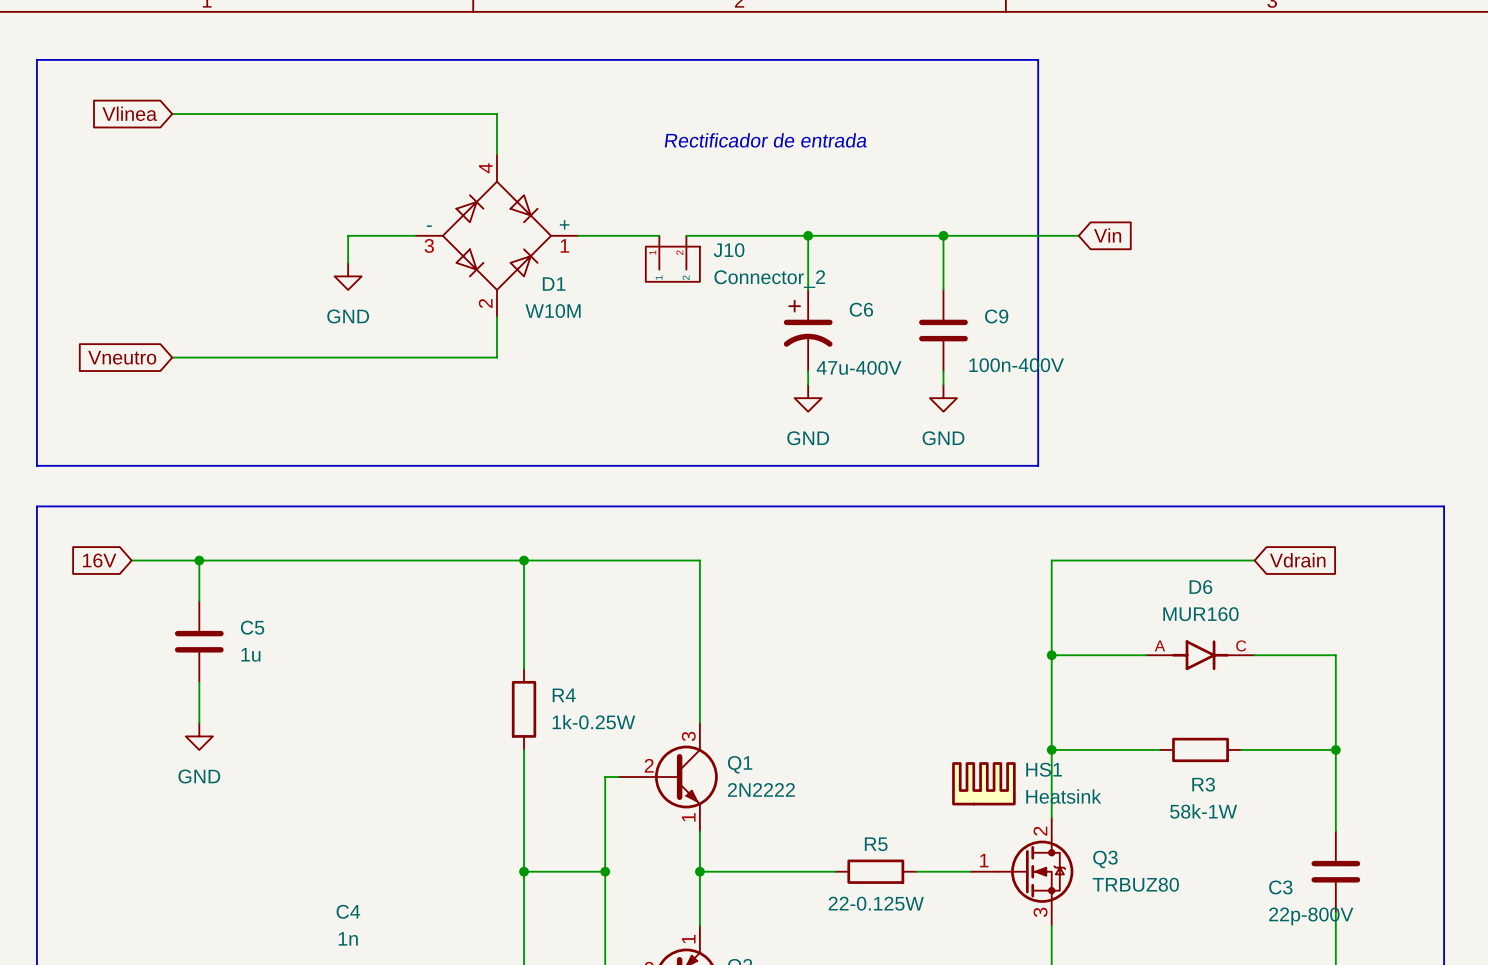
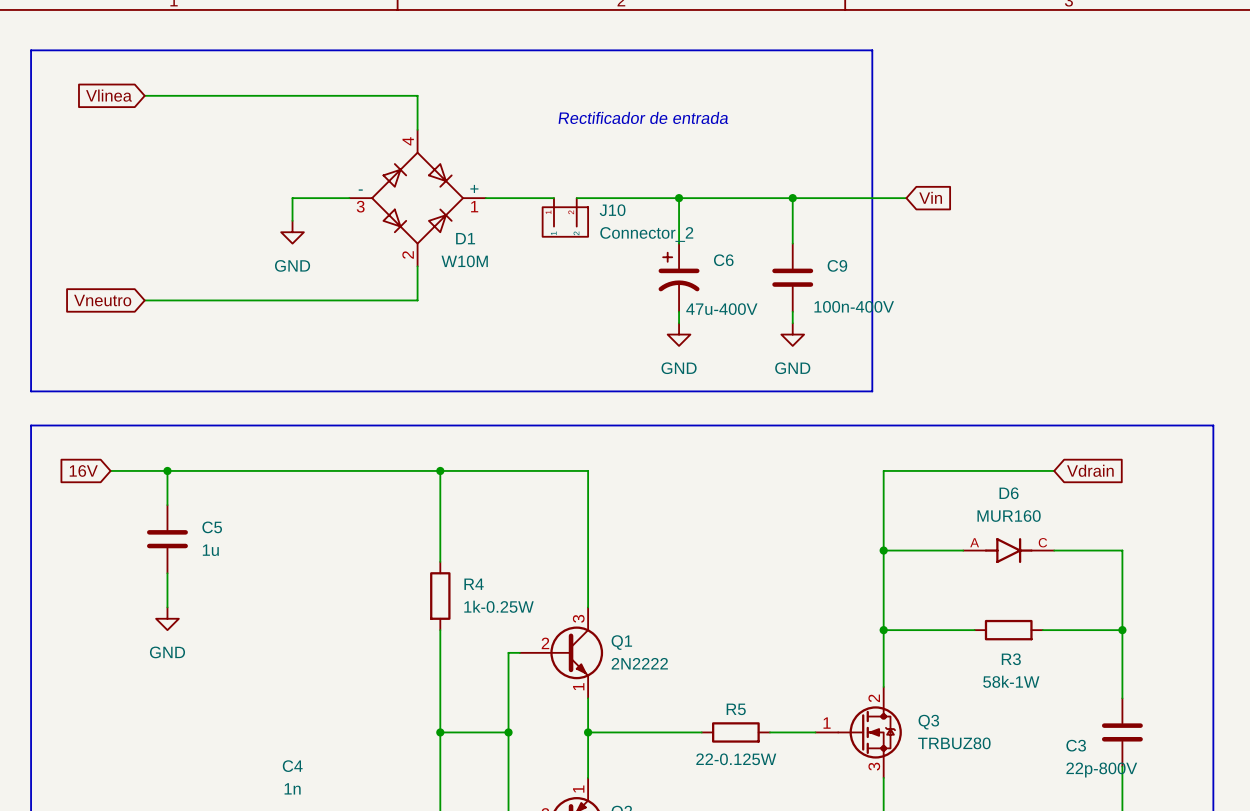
HS1: Heatsink (983, 783) -> none

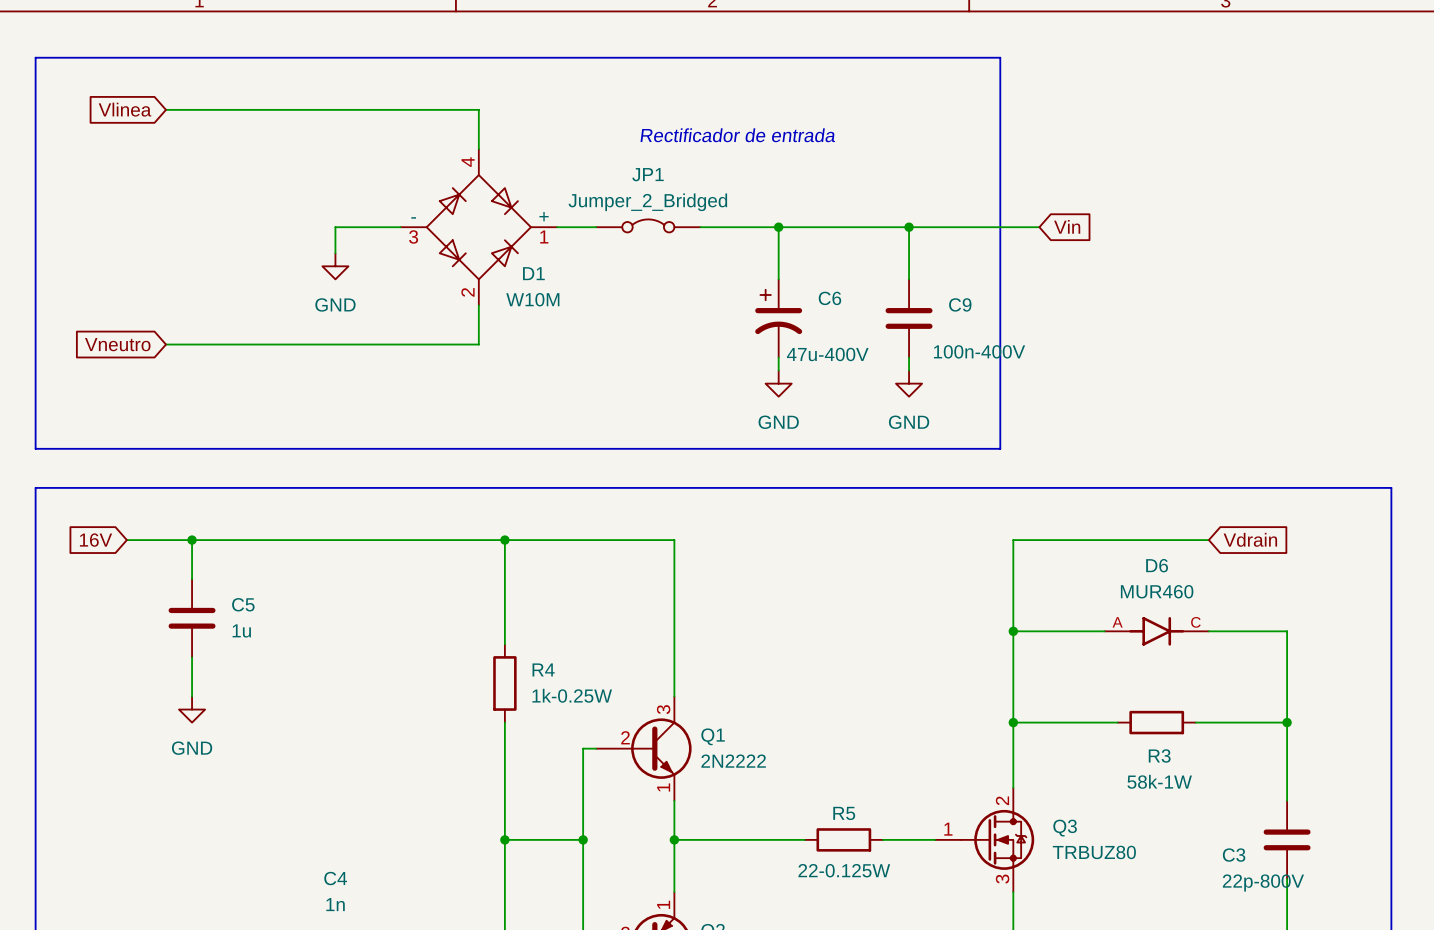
JP1: none -> Jumper_2_Bridged (648, 225)
J10: Connector_2 (565, 217) -> none
D6 value: MUR160 (1009, 516) -> MUR460 (1157, 591)

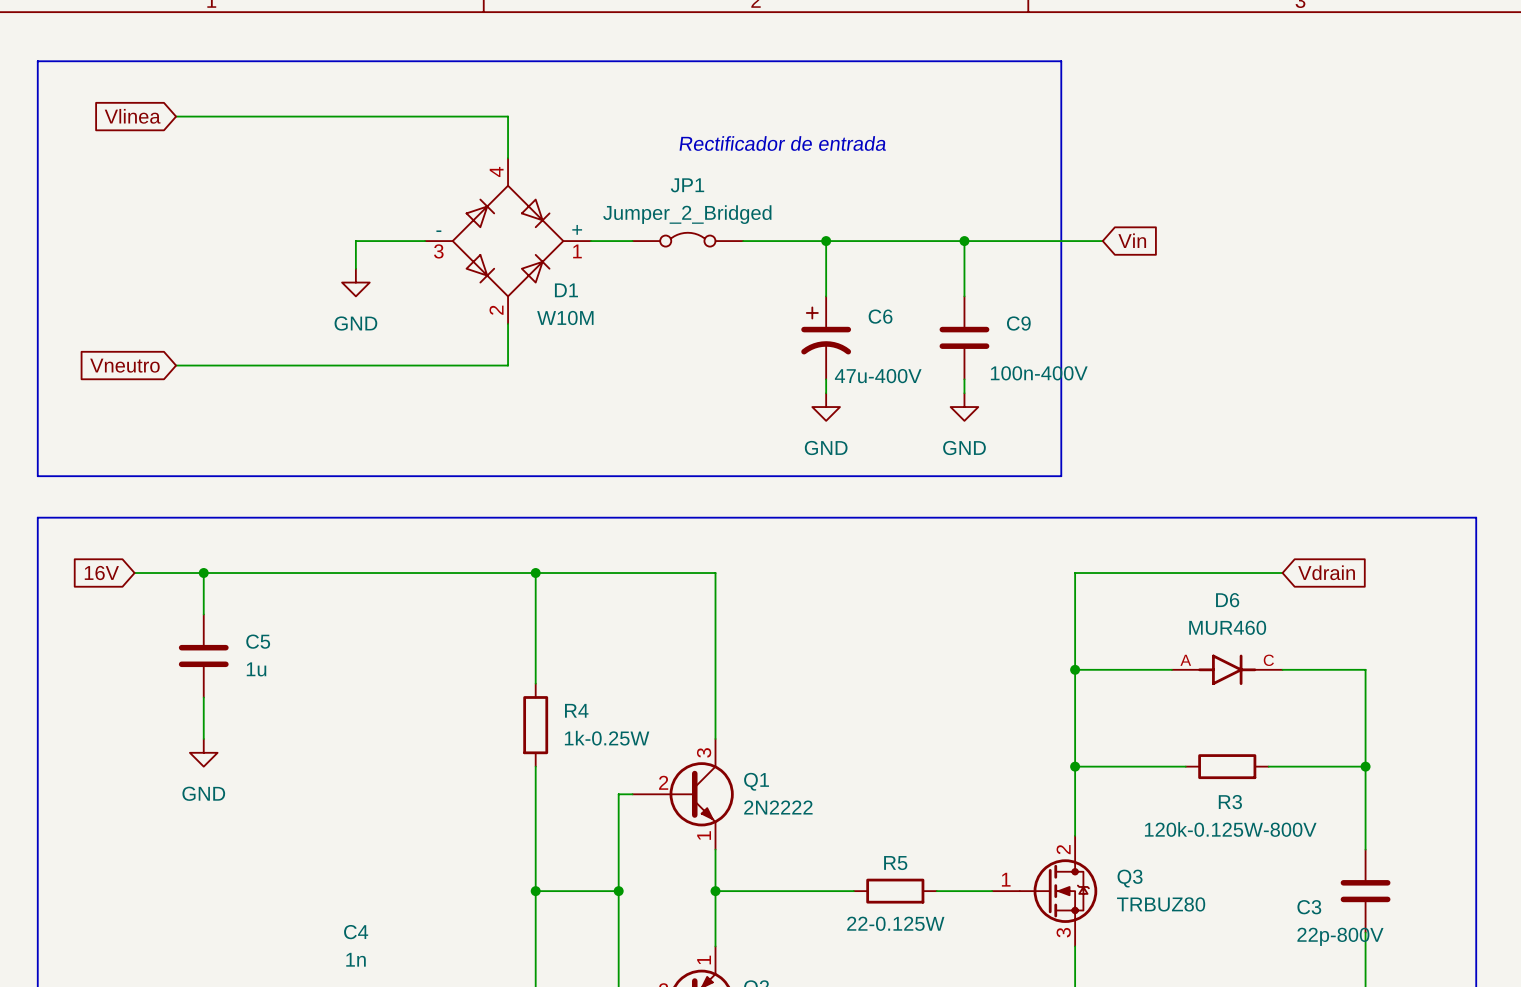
R3 value: 58k-1W (1159, 781) -> 120k-0.125W-800V (1230, 829)

